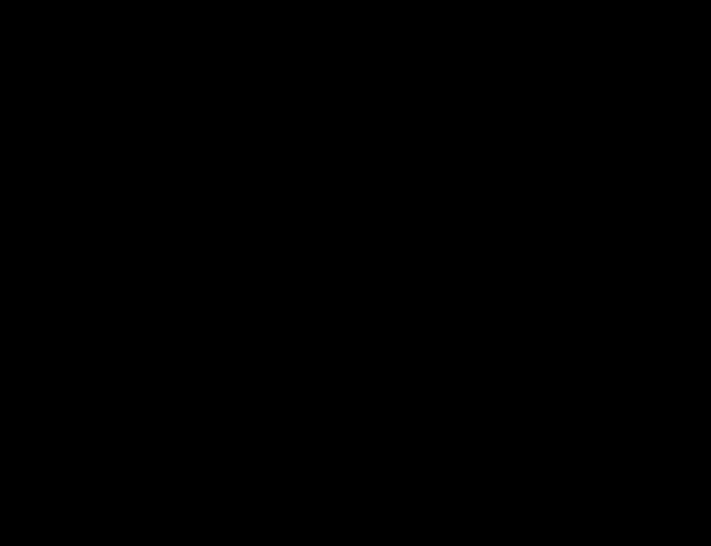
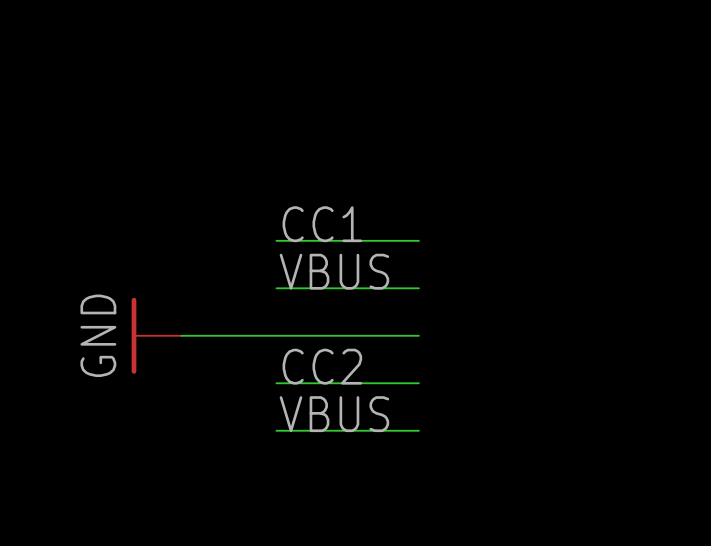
label: none -> CC1 (322, 224)
wire: none -> (276, 240) (418, 240)
label: none -> VBUS (334, 271)
wire: none -> (276, 288) (418, 288)
power symbol: none -> GND (156, 335)
wire: none -> (181, 335) (418, 335)
label: none -> CC2 (322, 366)
wire: none -> (276, 383) (418, 383)
label: none -> VBUS (334, 414)
wire: none -> (276, 430) (418, 430)

